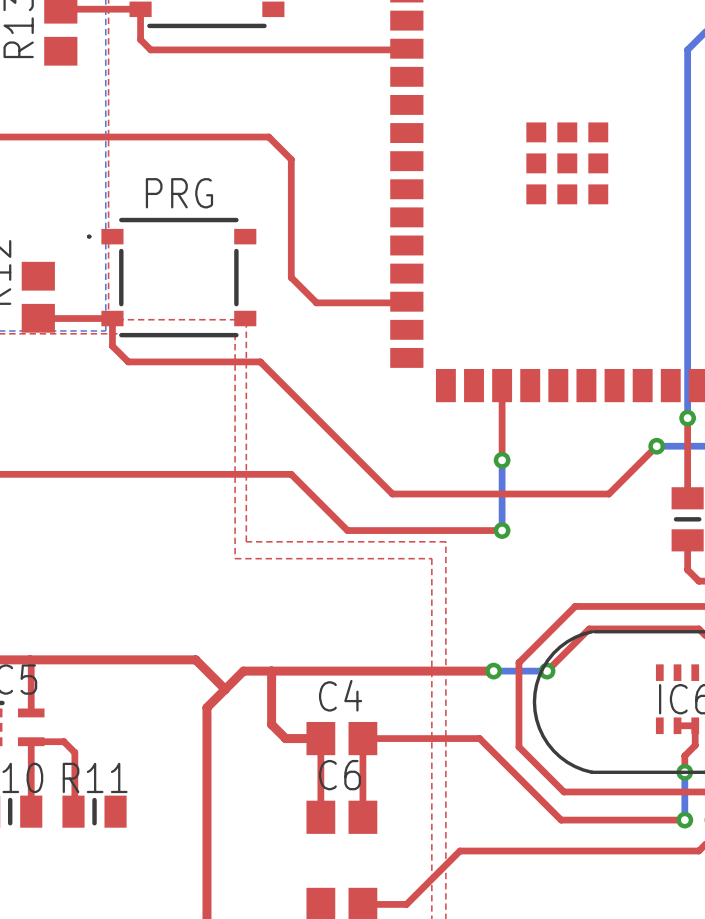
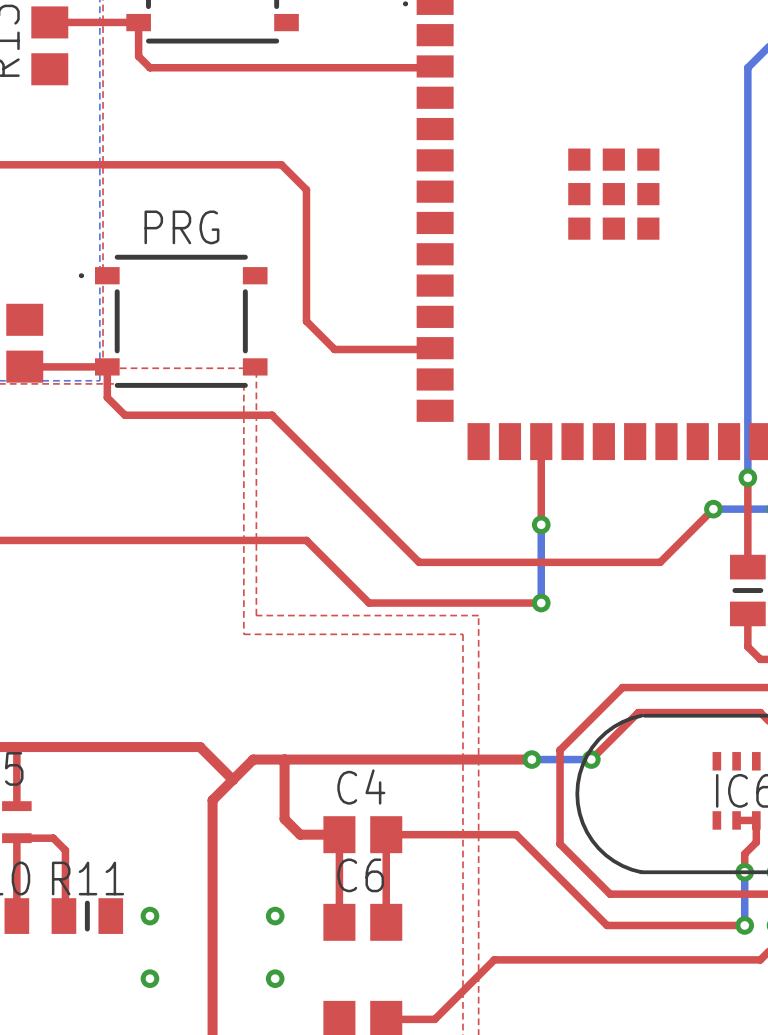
via: none -> (149, 916)
via: none -> (275, 916)
via: none -> (149, 978)
via: none -> (275, 978)

